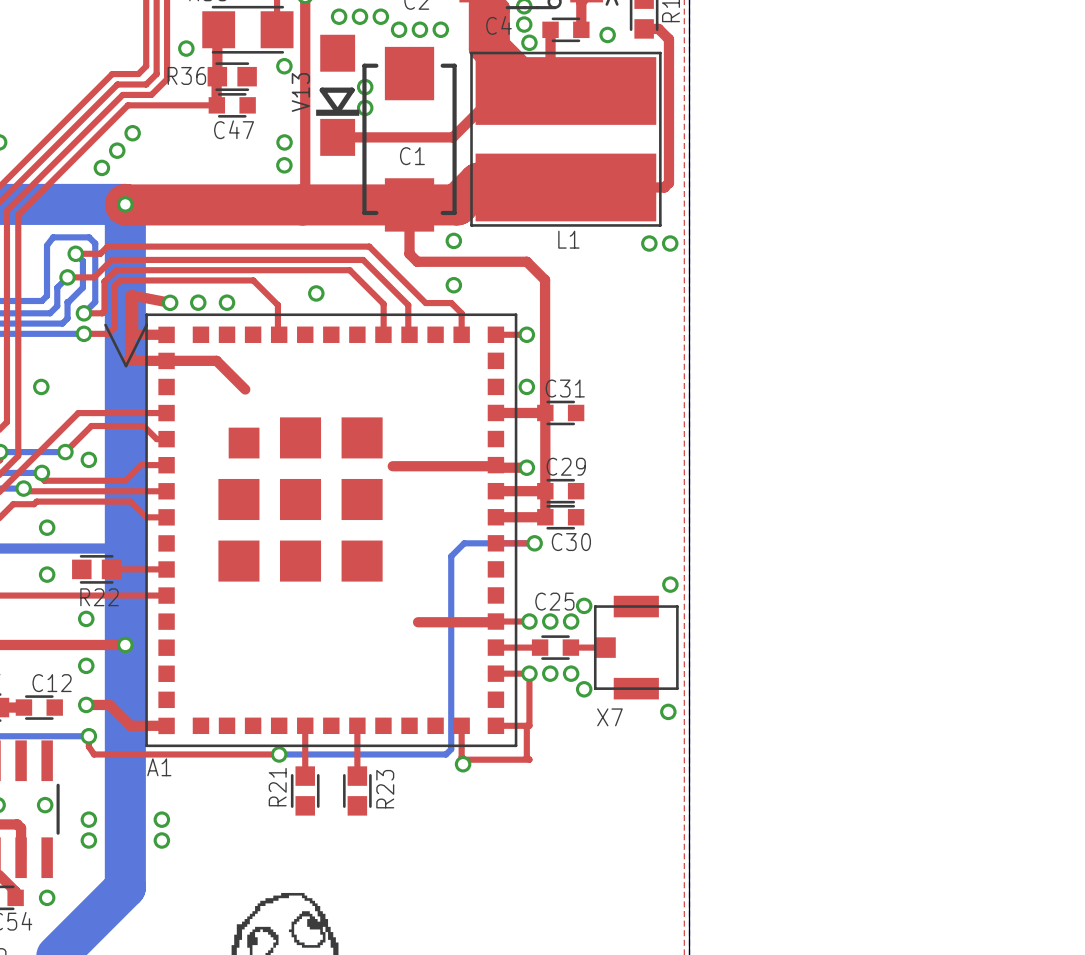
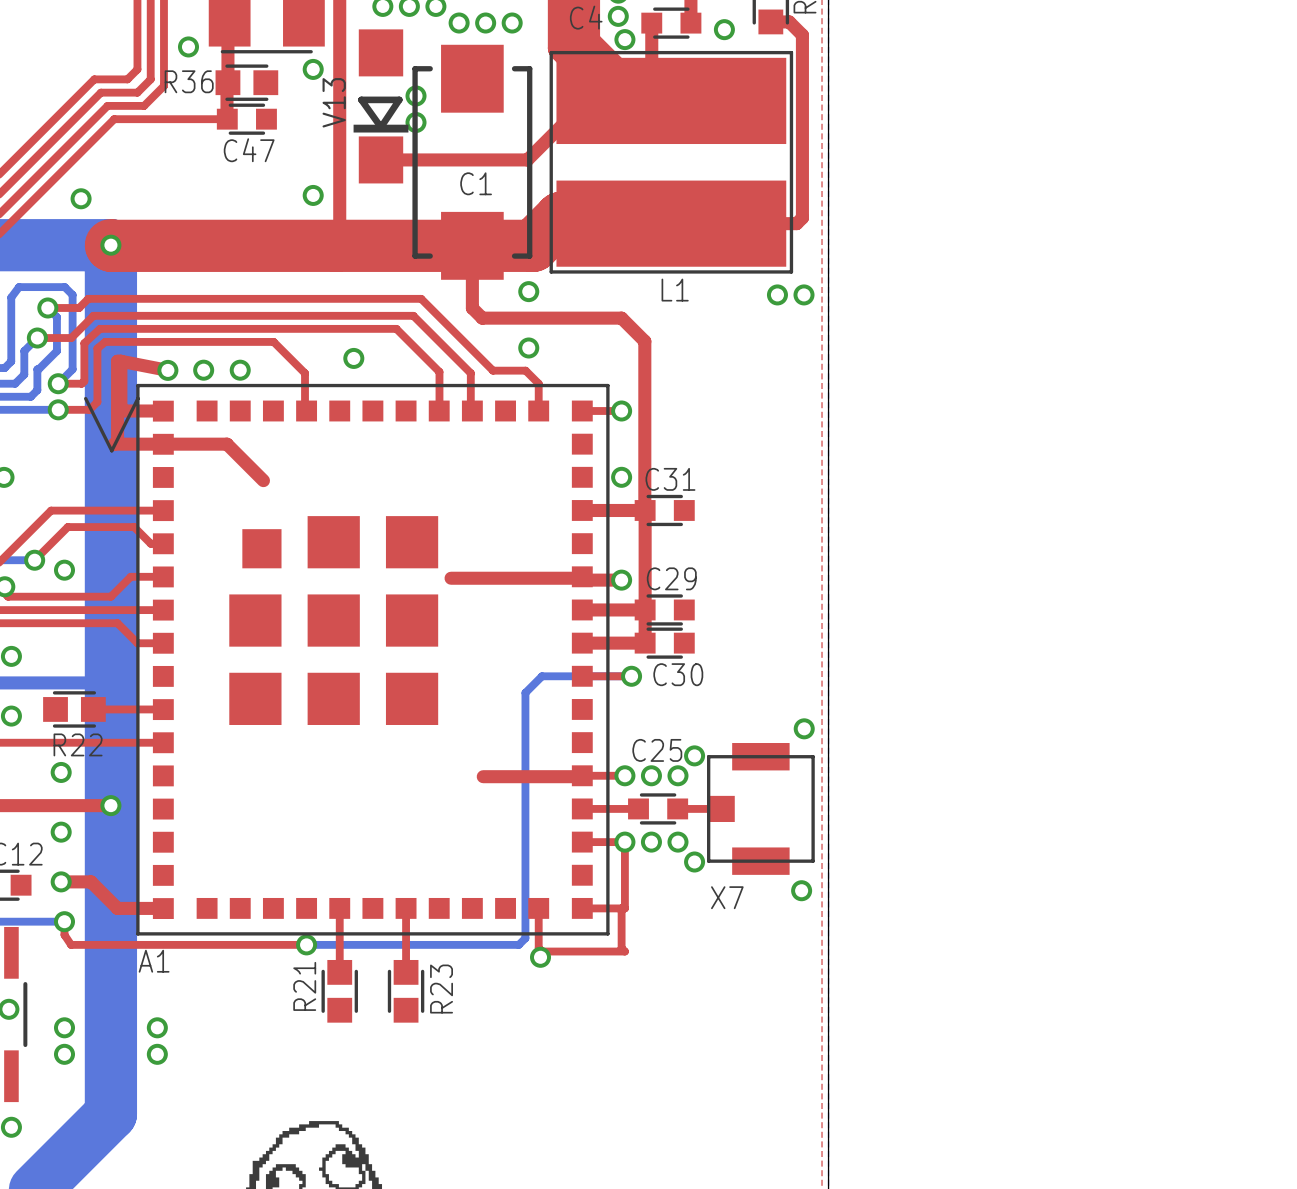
via: (132, 133) -> none
via: (284, 142) -> none
via: (117, 150) -> none

